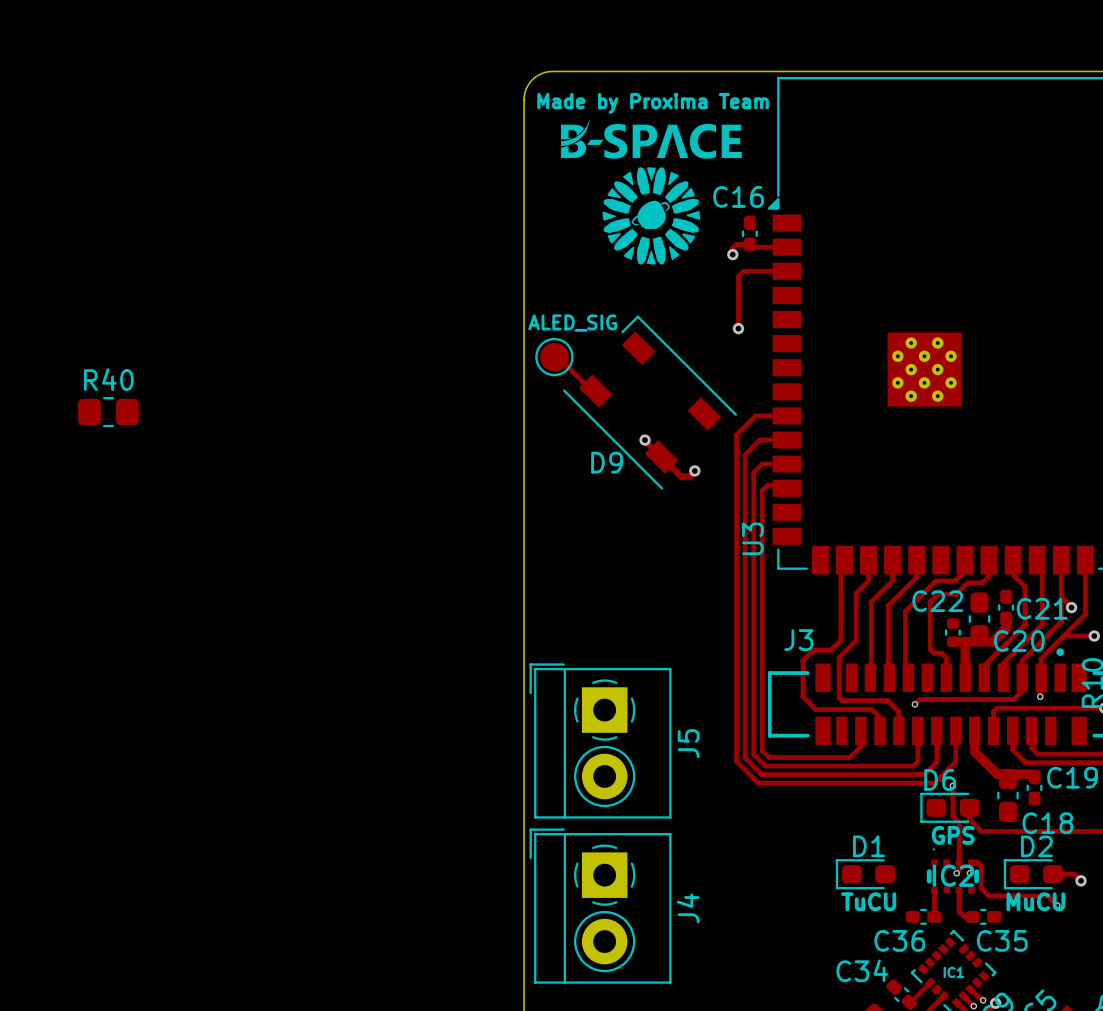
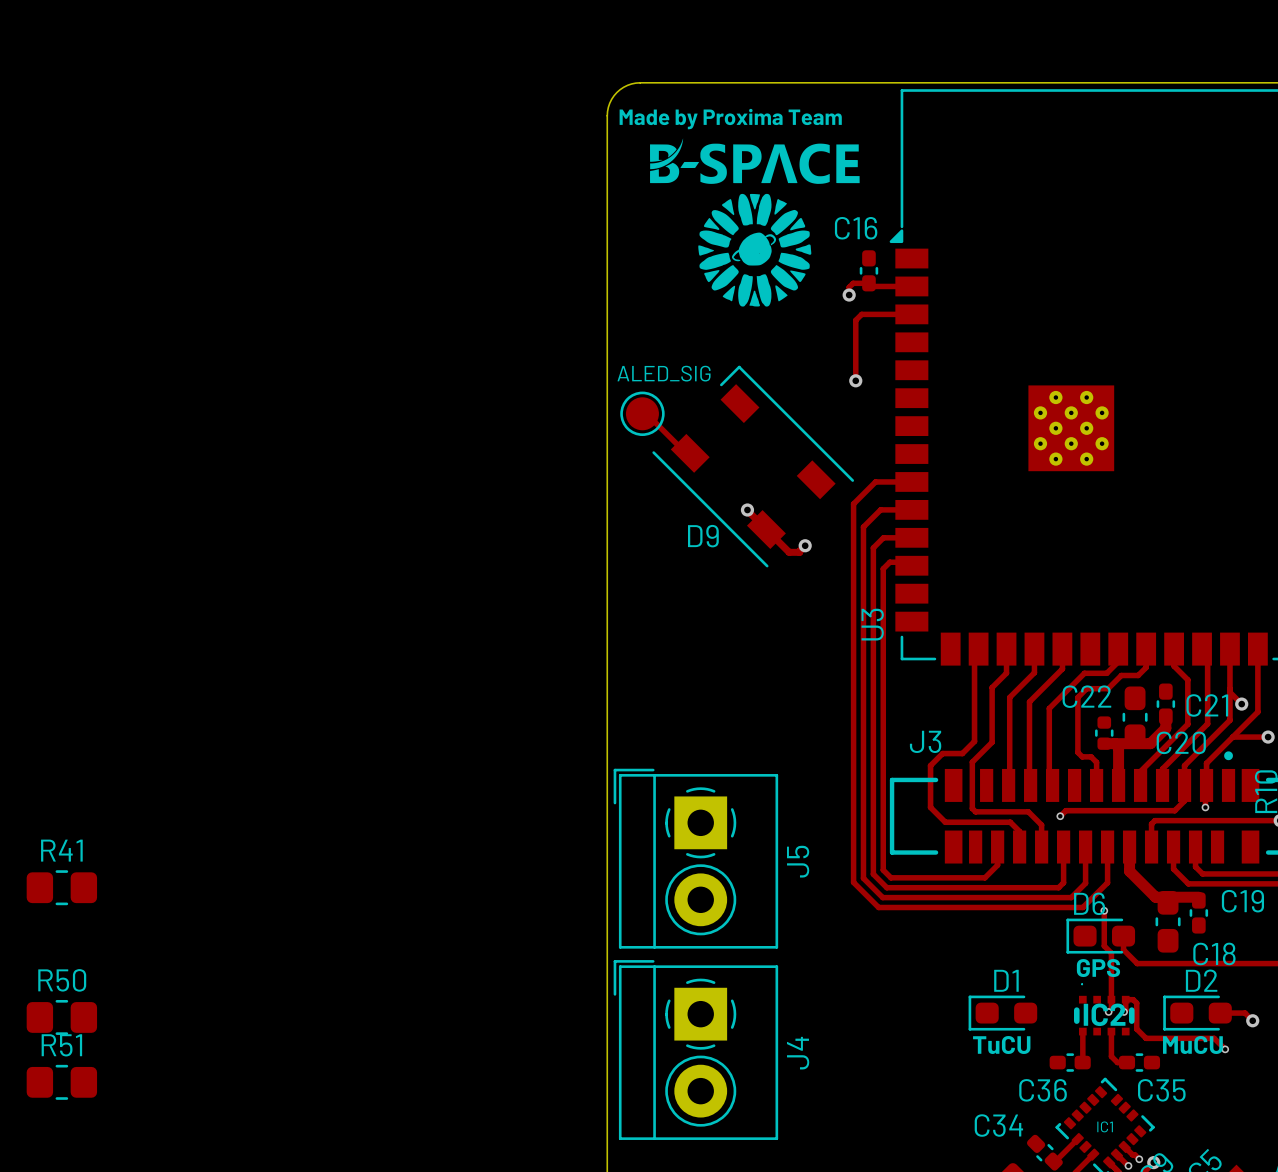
R40: (108, 412) -> none
R41: none -> (61, 887)
R50: none -> (61, 1017)
R51: none -> (61, 1082)

